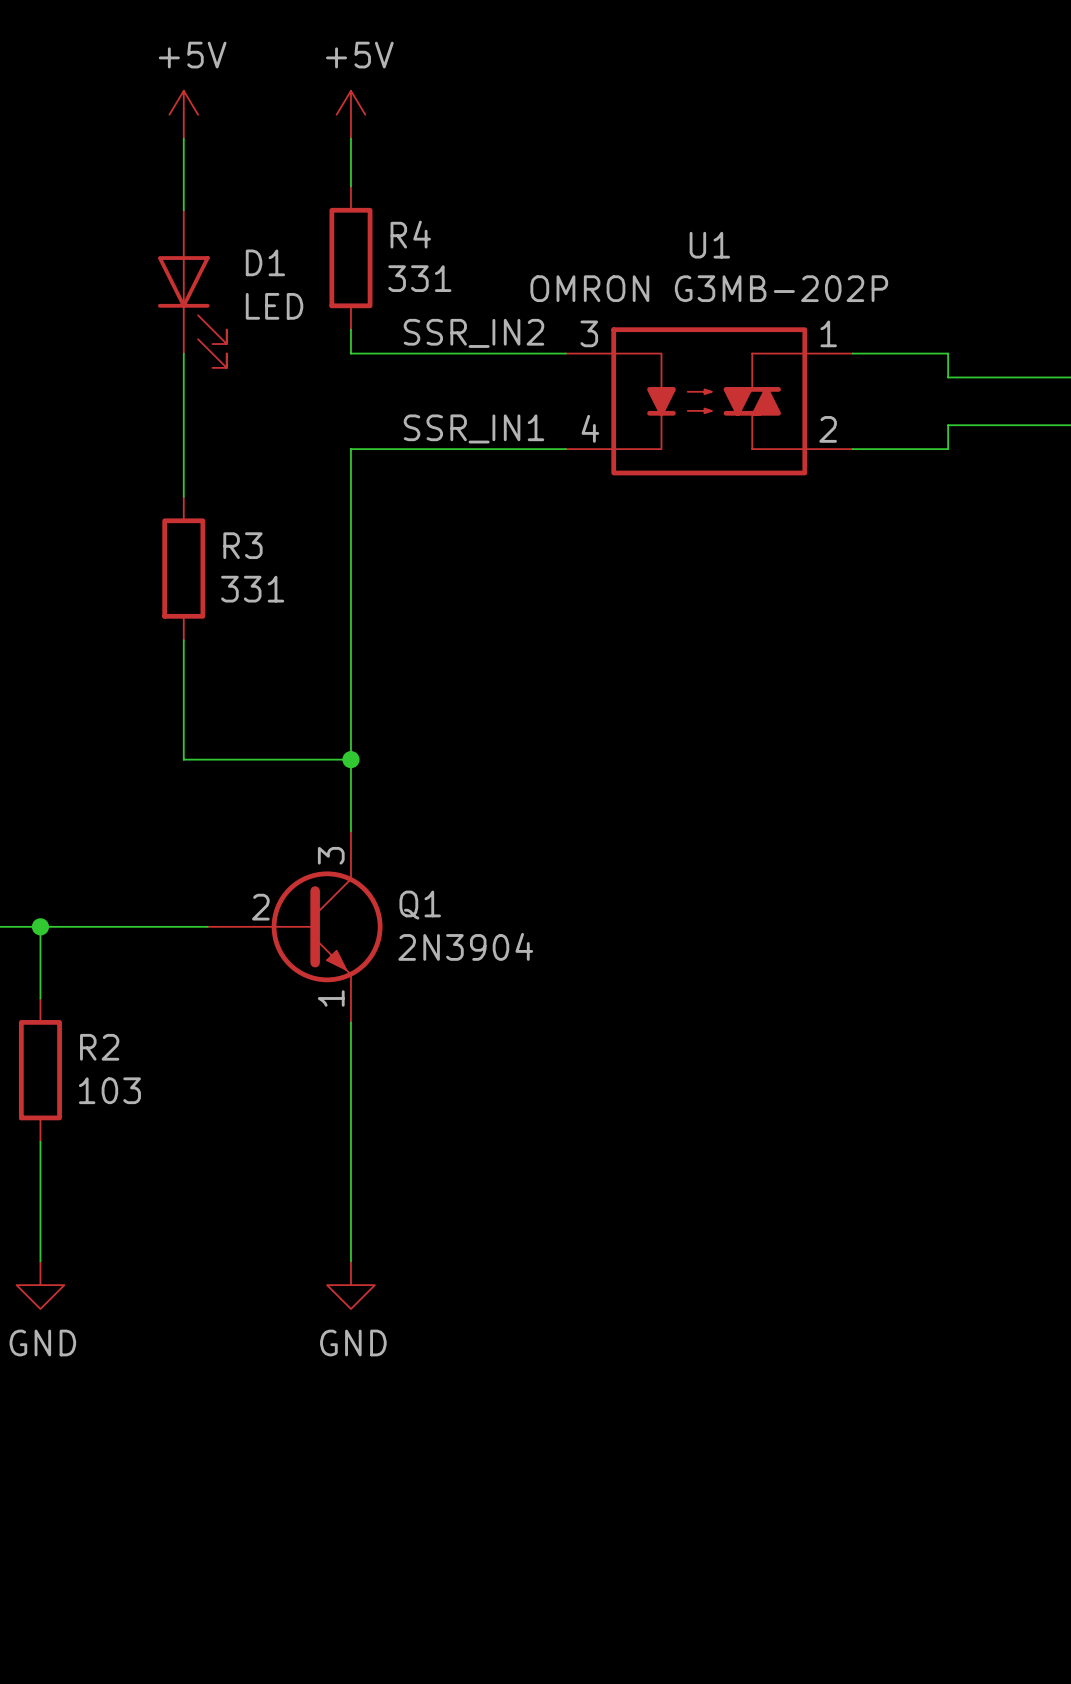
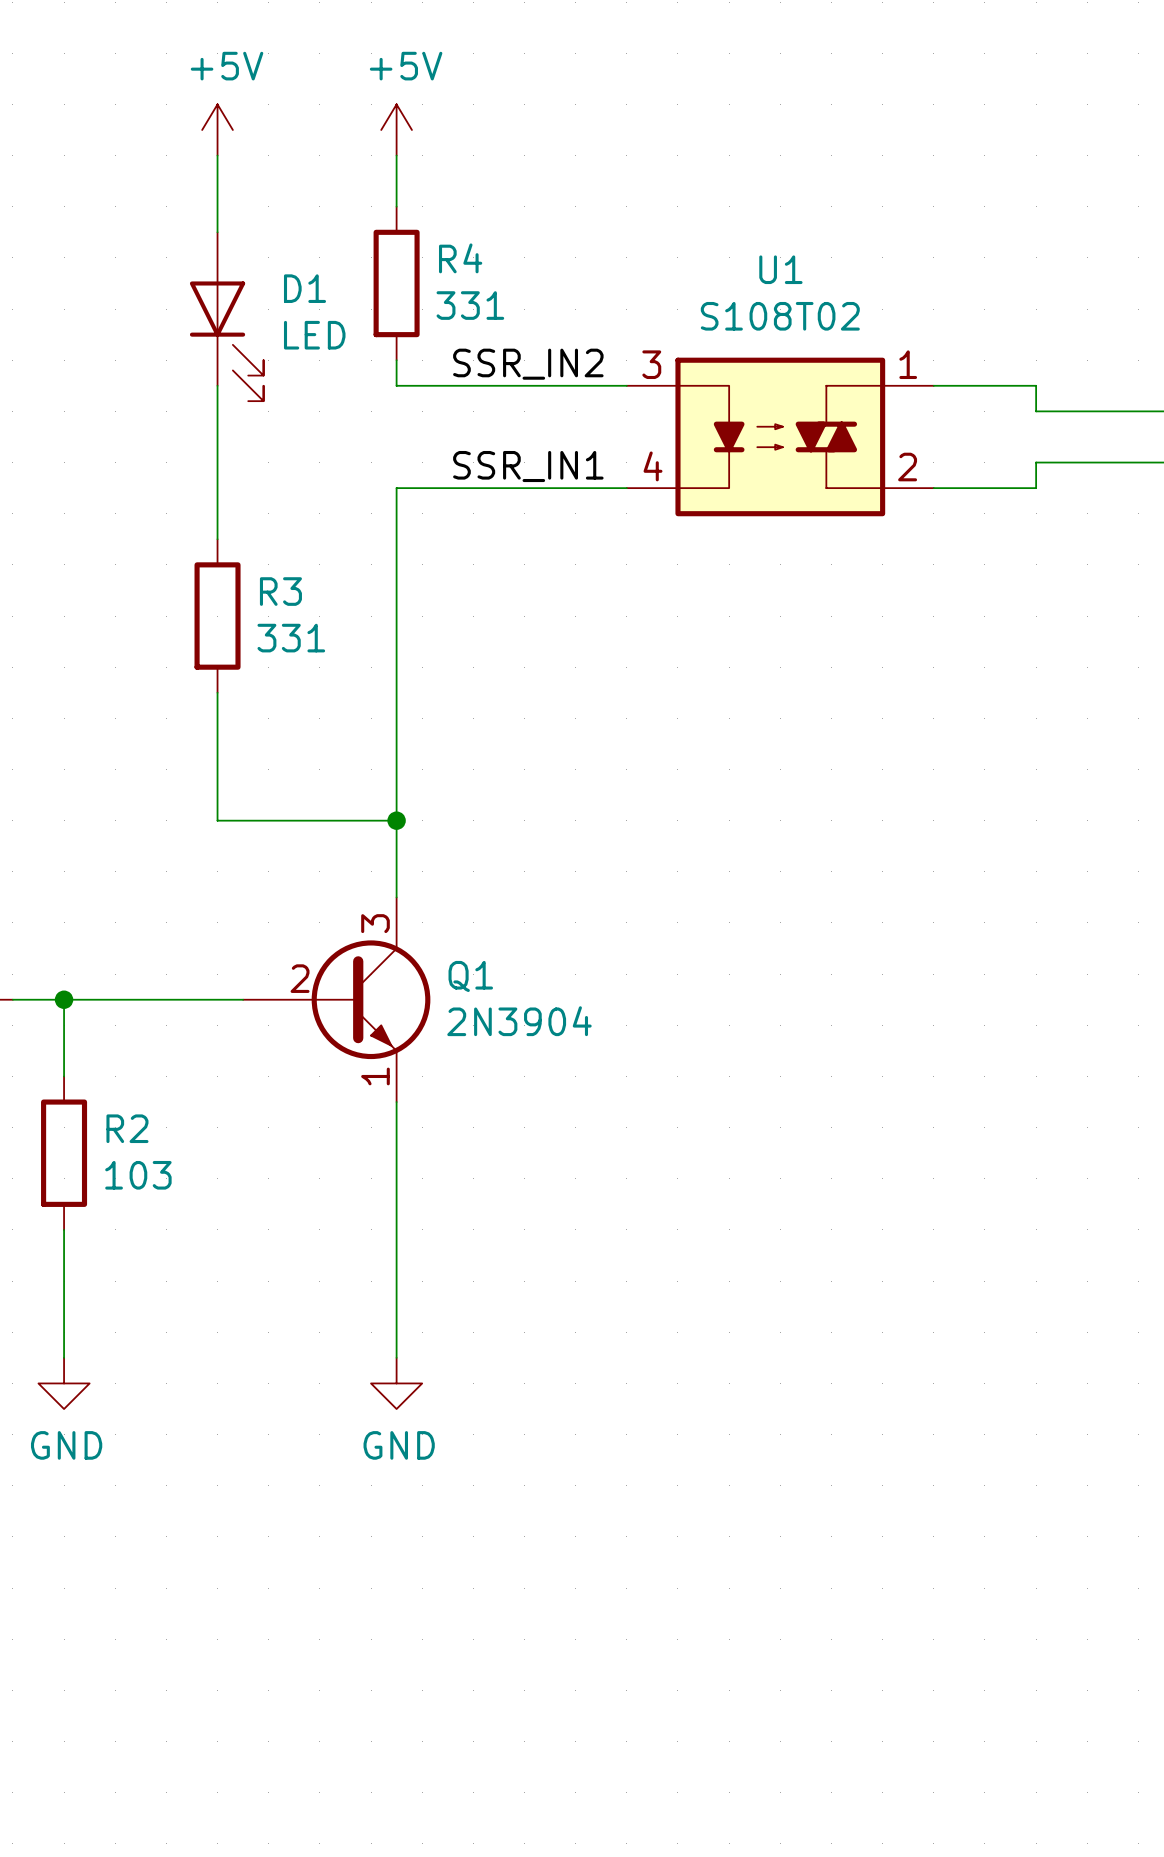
U1 value: OMRON G3MB-202P (709, 288) -> S108T02 (780, 316)

